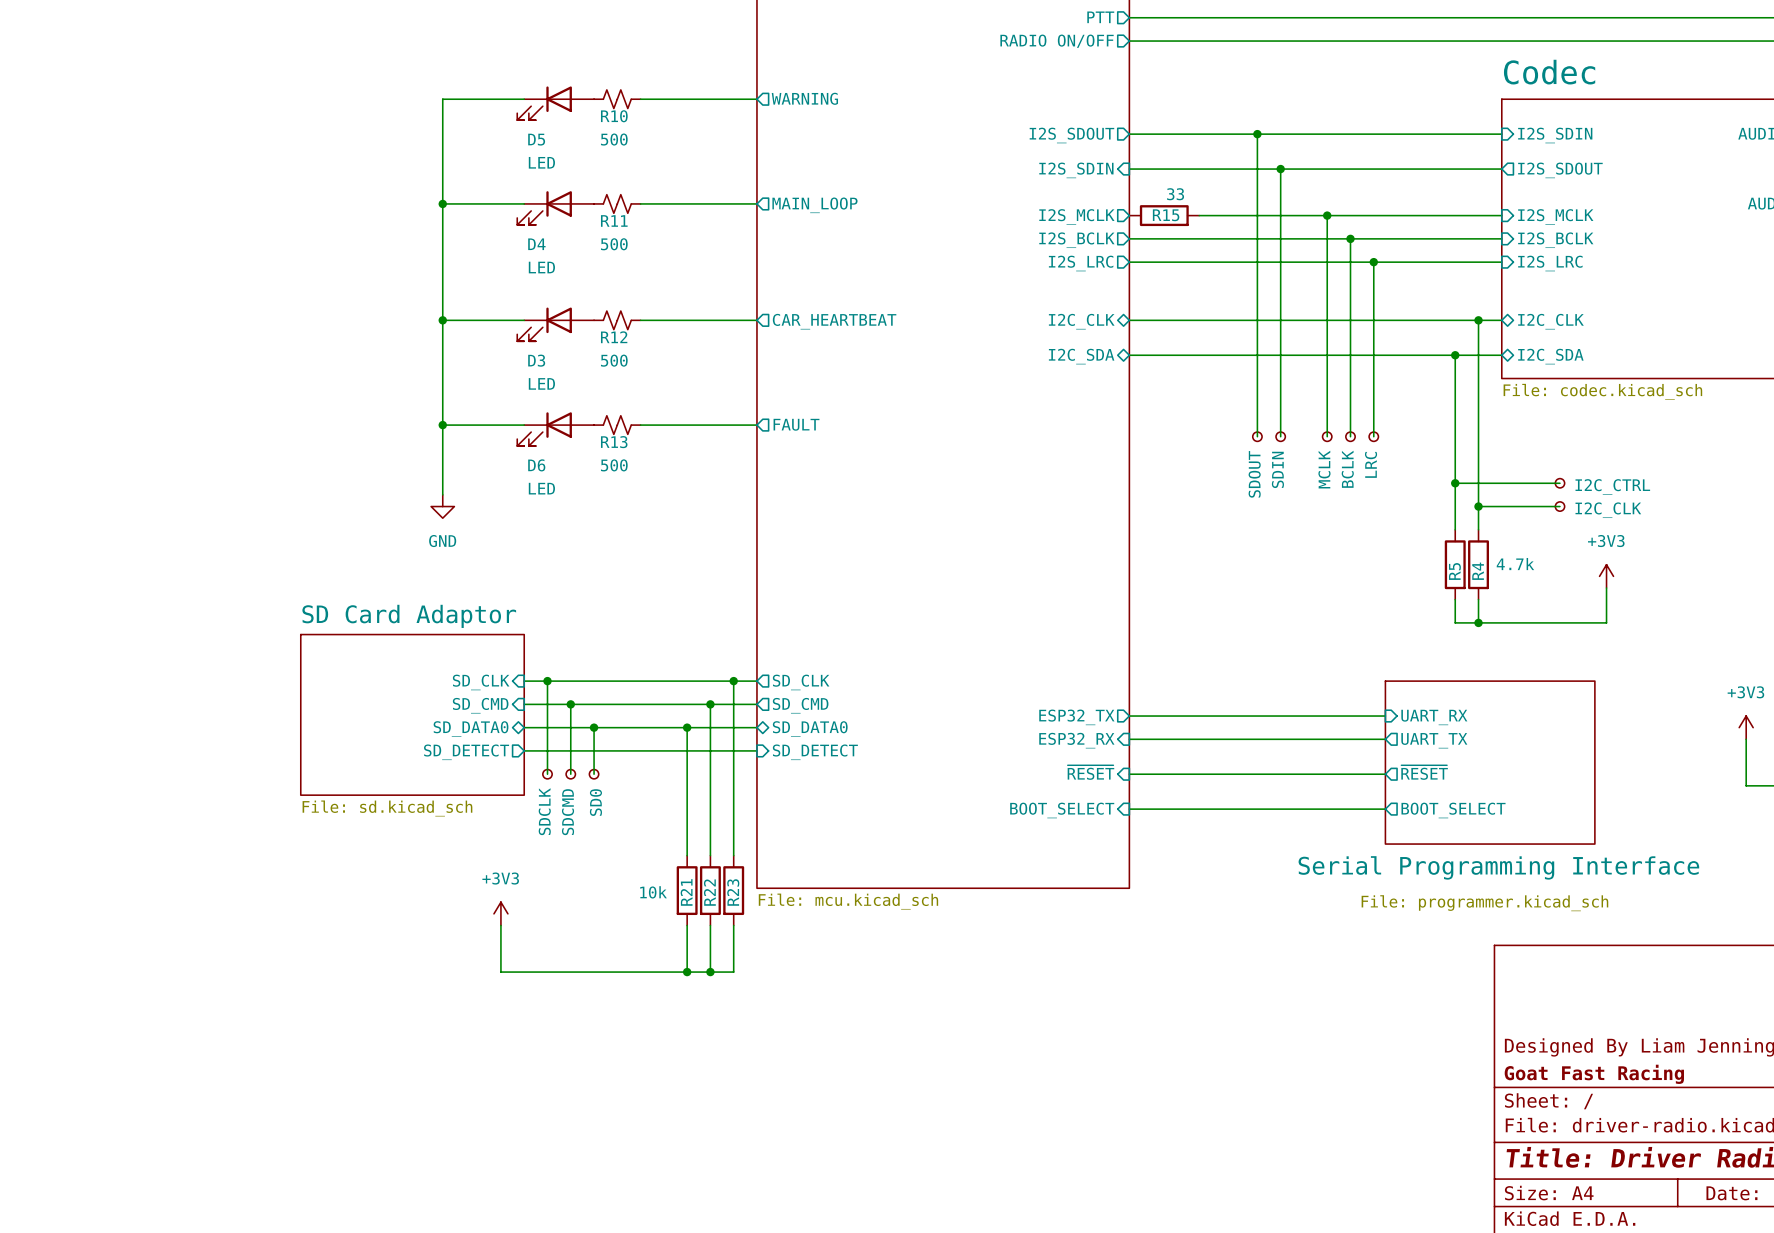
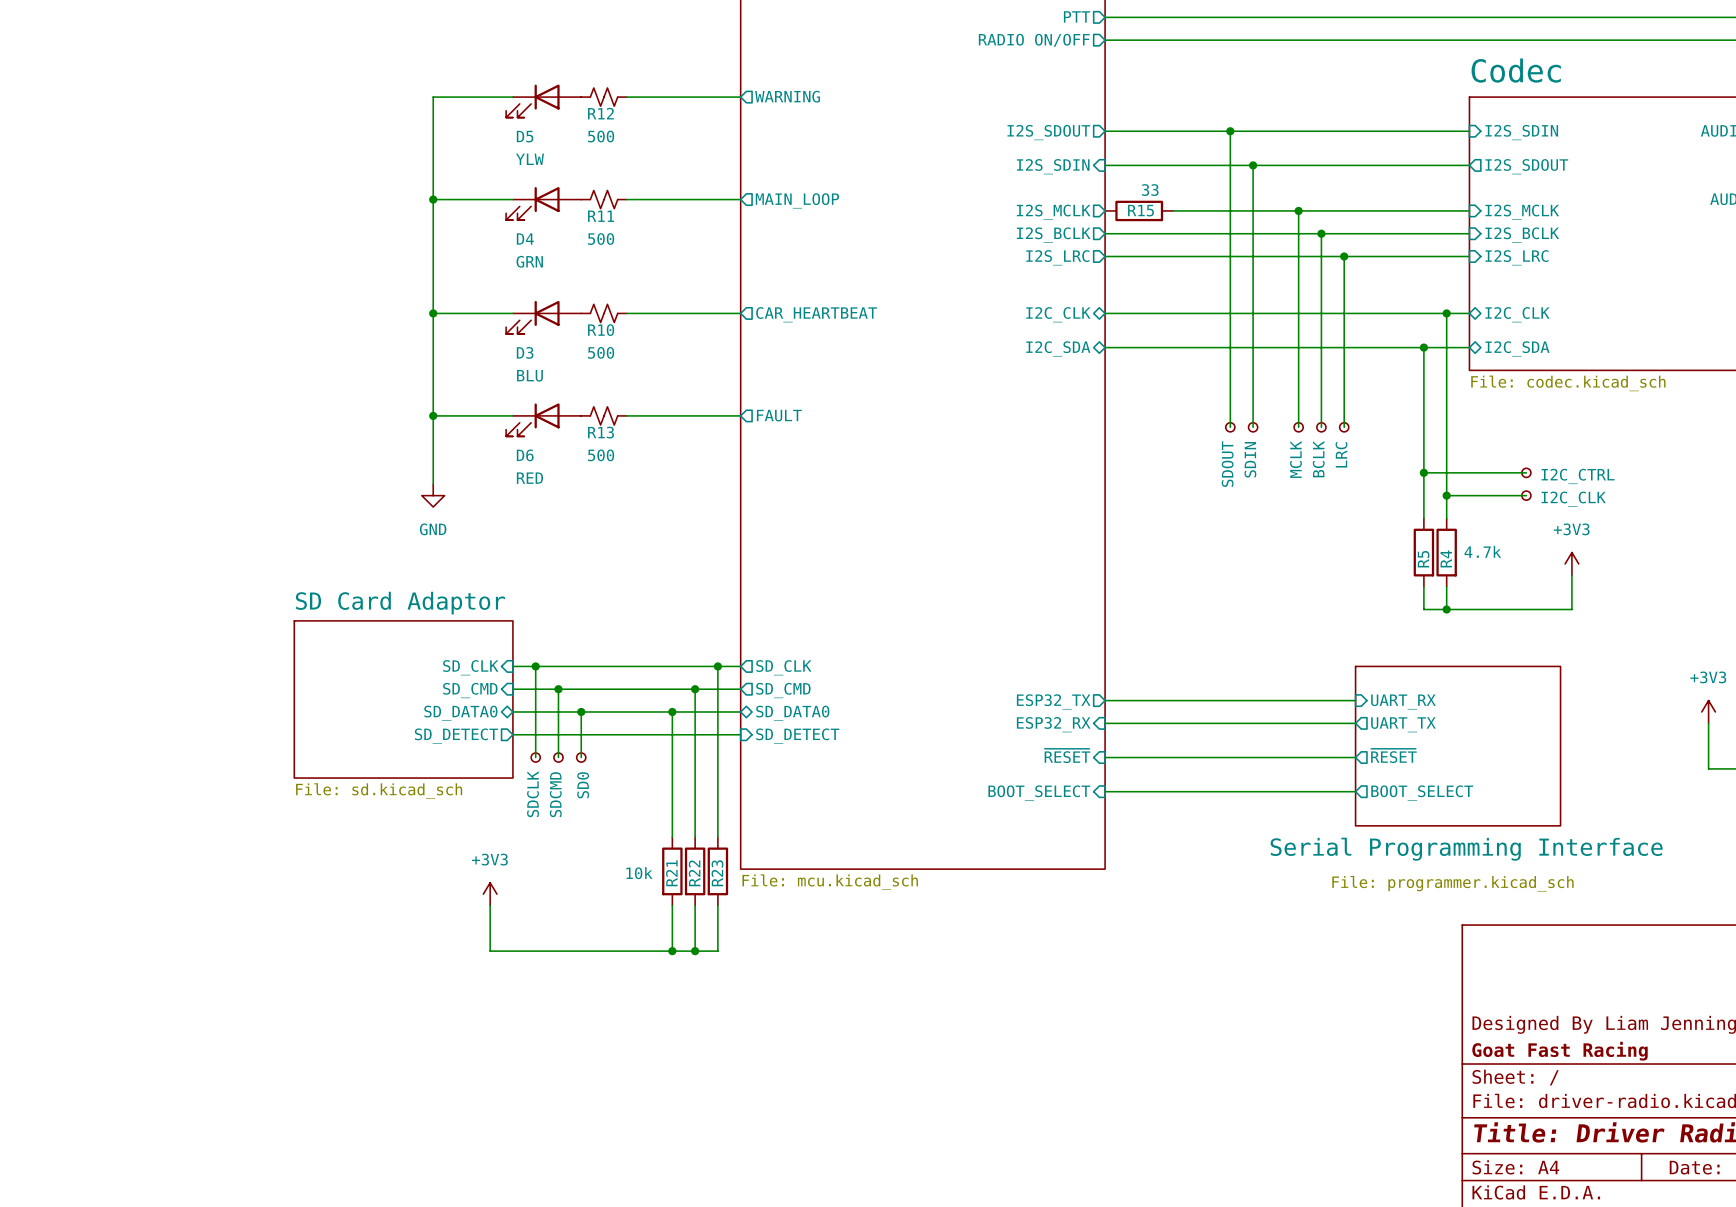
R10 name: R10 (614, 116) -> R12 (600, 113)
D5 value: LED (541, 162) -> YLW (530, 159)
D4 value: LED (541, 267) -> GRN (529, 261)
R12 name: R12 (614, 337) -> R10 (601, 330)
D3 value: LED (541, 383) -> BLU (529, 375)
D6 value: LED (541, 488) -> RED (529, 478)

